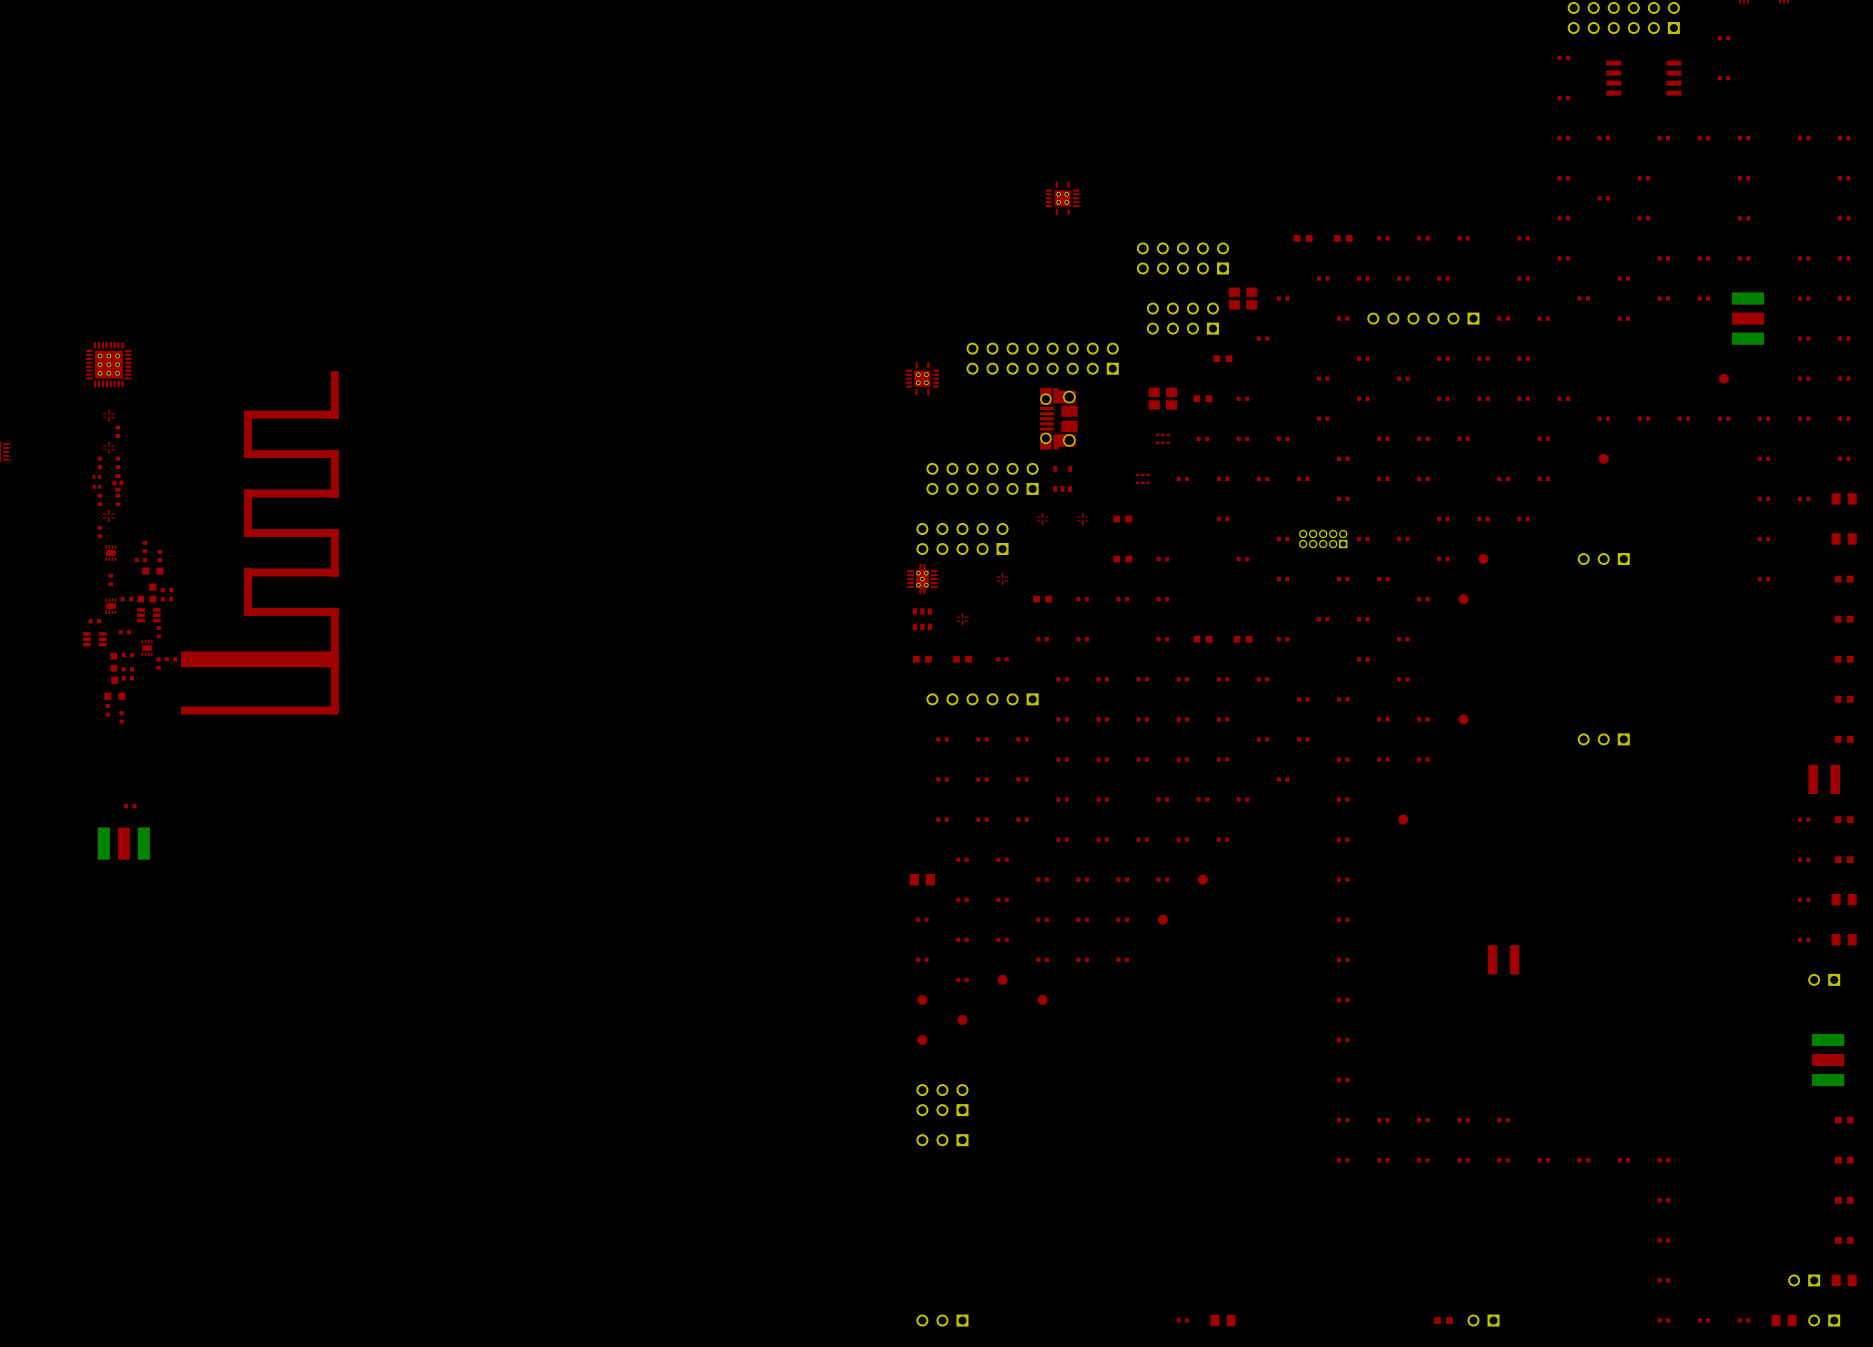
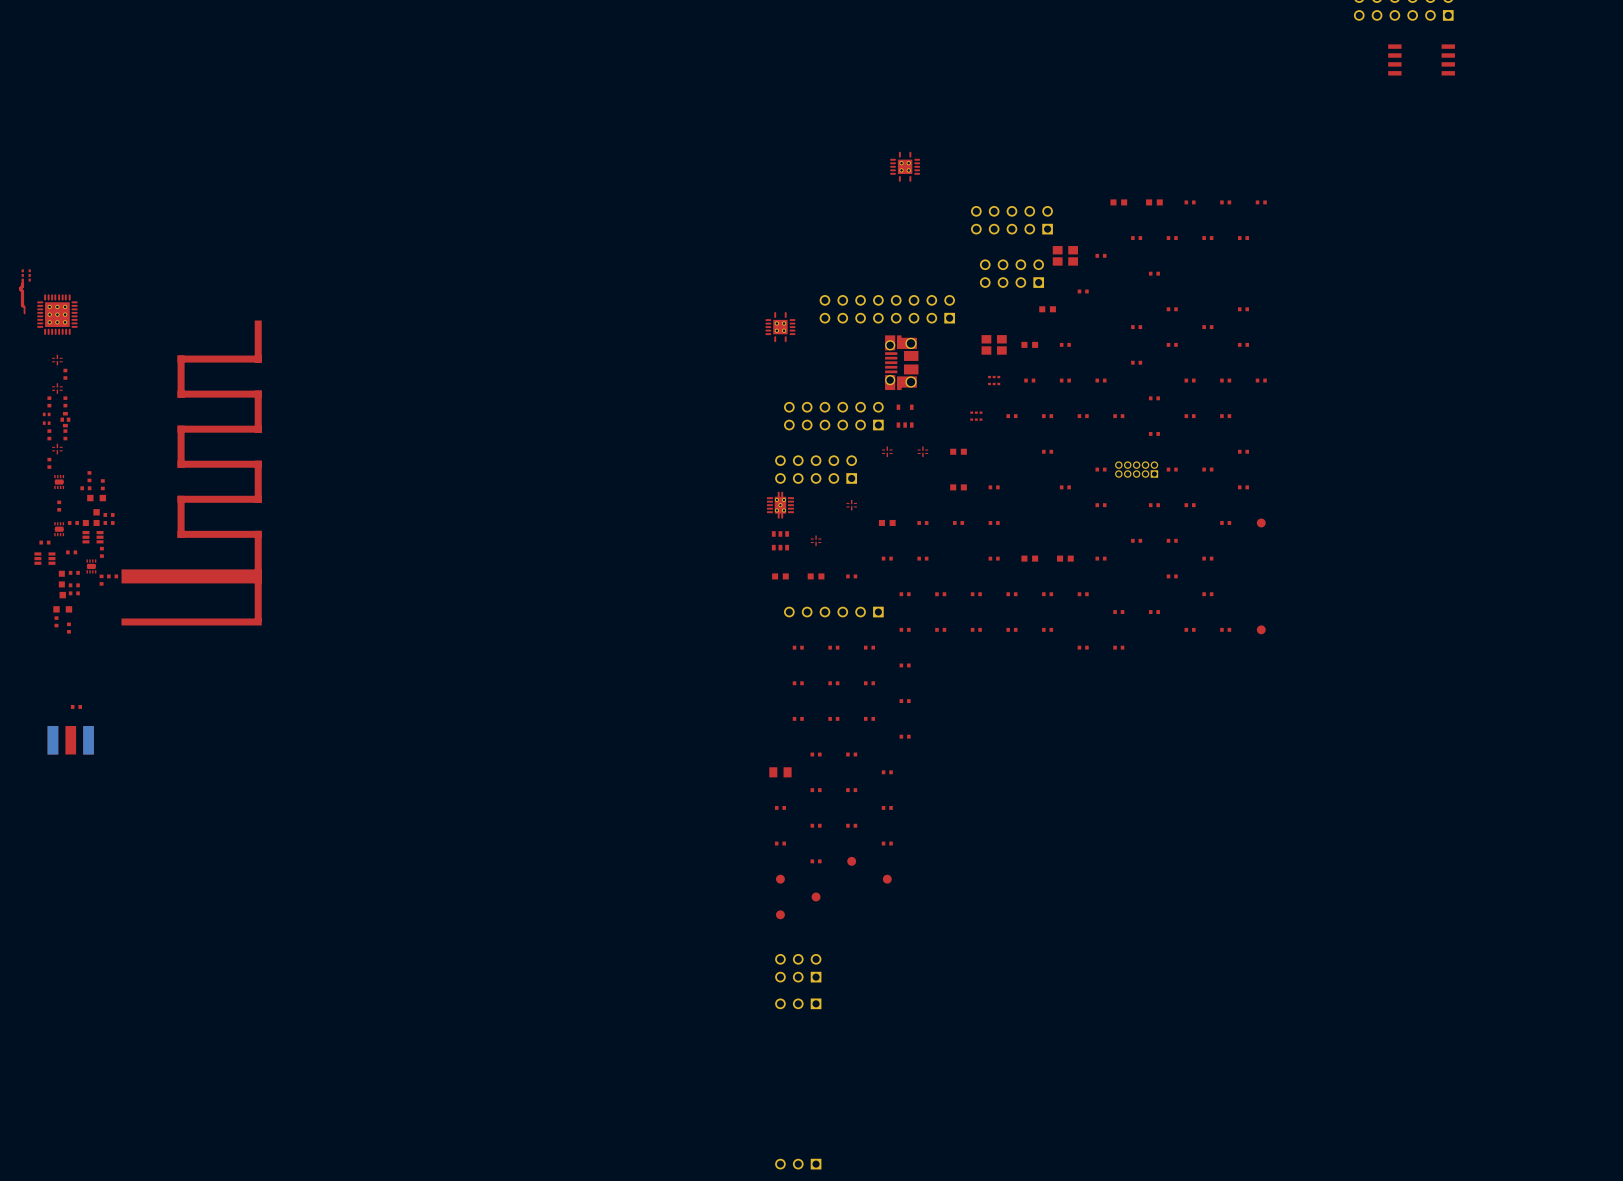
part: (1723, 38) -> none
part: (1563, 58) -> none
part: (1723, 78) -> none
part: (1563, 98) -> none
part: (1563, 138) -> none
part: (1603, 138) -> none
part: (1663, 138) -> none
part: (1703, 138) -> none
part: (1744, 138) -> none
part: (1804, 138) -> none
part: (1844, 138) -> none
part: (1563, 178) -> none
part: (1643, 178) -> none
part: (1744, 178) -> none
part: (1844, 178) -> none
part: (1603, 198) -> none
part: (1563, 218) -> none
part: (1643, 218) -> none
part: (1744, 218) -> none
part: (1844, 218) -> none
part: (1523, 238) -> none
part: (1563, 258) -> none
part: (1663, 258) -> none
part: (1703, 258) -> none
part: (1744, 258) -> none
part: (1804, 258) -> none
part: (1844, 258) -> none
part: (1523, 278) -> none
part: (1623, 278) -> none
part: (1583, 298) -> none
part: (1663, 298) -> none
part: (1703, 298) -> none
part: (1804, 298) -> none
part: (1844, 298) -> none
part: (1423, 318) -> none
part: (1503, 318) -> none
part: (1543, 318) -> none
part: (1623, 318) -> none
part: (1748, 318) -> none
part: none -> (26, 275)
top track: none -> (22, 280) (20, 289) (24, 313)
part: (1804, 338) -> none
part: (1844, 338) -> none
part: (1483, 358) -> none
part: (1523, 358) -> none
part: (1723, 378) -> none
part: (1804, 378) -> none
part: (1844, 378) -> none
part: (1483, 398) -> none
part: (1523, 398) -> none
part: (1563, 398) -> none
part: (1603, 418) -> none
part: (1643, 418) -> none
part: (1683, 418) -> none
part: (1723, 418) -> none
part: (1764, 418) -> none
part: (1804, 418) -> none
part: (1844, 418) -> none
part: (1543, 438) -> none
part: (1603, 458) -> none
part: (1764, 458) -> none
part: (1844, 458) -> none
part: (1503, 478) -> none
part: (1543, 478) -> none
part: (1764, 498) -> none
part: (1804, 498) -> none
part: (1844, 498) -> none
part: (1483, 518) -> none
part: (1523, 518) -> none
part: (1764, 539) -> none
part: (1844, 539) -> none
part: (1483, 559) -> none
part: (1603, 559) -> none
part: (1764, 579) -> none
part: (1844, 579) -> none
part: (1844, 619) -> none
part: (1844, 659) -> none
part: (1844, 699) -> none
part: (1603, 739) -> none
part: (1844, 739) -> none
part: (1102, 759) -> none
part: (1142, 759) -> none
part: (1182, 759) -> none
part: (1223, 759) -> none
part: (1343, 759) -> none
part: (1383, 759) -> none
part: (1423, 759) -> none
part: (1283, 779) -> none
part: (1824, 779) -> none
part: (1102, 799) -> none
part: (1162, 799) -> none
part: (1202, 799) -> none
part: (1243, 799) -> none
part: (1343, 799) -> none
part: (1403, 819) -> none
part: (1804, 819) -> none
part: (1844, 819) -> none
part: (1102, 839) -> none
part: (1142, 839) -> none
part: (1182, 839) -> none
part: (1223, 839) -> none
part: (1343, 839) -> none
part: (1804, 859) -> none
part: (1844, 859) -> none
part: (1082, 879) -> none
part: (1122, 879) -> none
part: (1162, 879) -> none
part: (1202, 879) -> none
part: (1343, 879) -> none
part: (1804, 899) -> none
part: (1844, 899) -> none
part: (1082, 919) -> none
part: (1122, 919) -> none
part: (1162, 919) -> none
part: (1343, 919) -> none
part: (1804, 939) -> none
part: (1844, 939) -> none
part: (1082, 959) -> none
part: (1122, 959) -> none
part: (1343, 959) -> none
part: (1503, 959) -> none
part: (1824, 979) -> none
part: (1343, 999) -> none
part: (1343, 1039) -> none
part: (1828, 1060) -> none
part: (1343, 1080) -> none
part: (1343, 1120) -> none
part: (1383, 1120) -> none
part: (1423, 1120) -> none
part: (1463, 1120) -> none
part: (1503, 1120) -> none
part: (1844, 1120) -> none
part: (1343, 1160) -> none
part: (1383, 1160) -> none
part: (1423, 1160) -> none
part: (1463, 1160) -> none
part: (1503, 1160) -> none
part: (1543, 1160) -> none
part: (1583, 1160) -> none
part: (1623, 1160) -> none
part: (1663, 1160) -> none
part: (1844, 1160) -> none
part: (1663, 1200) -> none
part: (1844, 1200) -> none
part: (1663, 1240) -> none
part: (1844, 1240) -> none
part: (1663, 1280) -> none
part: (1804, 1280) -> none
part: (1844, 1280) -> none
part: (1182, 1320) -> none
part: (1223, 1320) -> none
part: (1443, 1320) -> none
part: (1483, 1320) -> none
part: (1663, 1320) -> none
part: (1703, 1320) -> none
part: (1744, 1320) -> none
part: (1784, 1320) -> none
part: (1824, 1320) -> none

